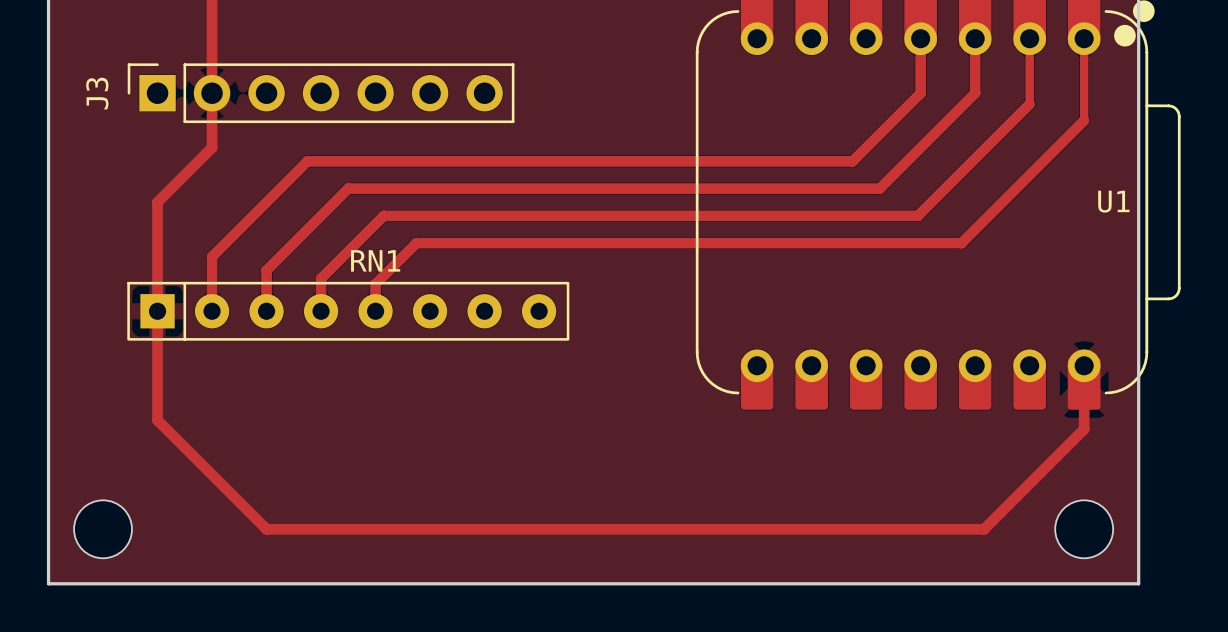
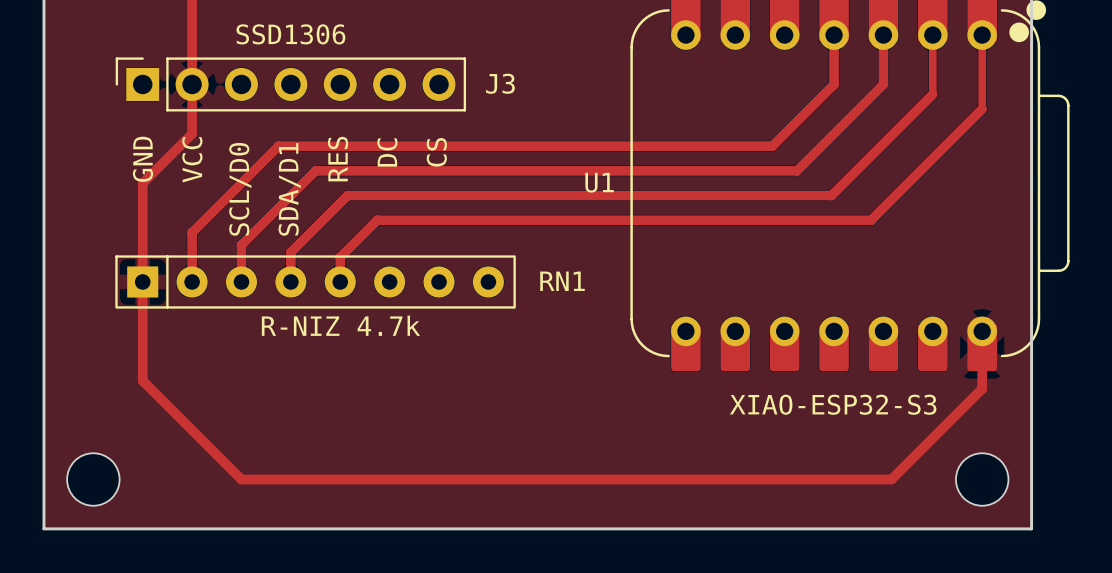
J3 value: none -> SSD1306 (290, 34)
J3 name rotation: 0° (97, 93) -> 90° clockwise (500, 83)
J3 name position: J3 (97, 93) -> J3 (500, 83)
text: none -> DC (387, 152)
text: none -> CS (436, 152)
text: none -> GND (142, 159)
text: none -> RES (338, 159)
text: none -> VCC (192, 159)
U1 name position: U1 (1113, 201) -> U1 (599, 182)
text: none -> SCL/D0 (240, 189)
text: none -> SDA/D1 (289, 189)
RN1 name position: RN1 (375, 260) -> RN1 (562, 281)
RN1 value: none -> R-NIZ 4.7k (340, 325)
U1 value: none -> XIAO-ESP32-S3 (833, 404)

